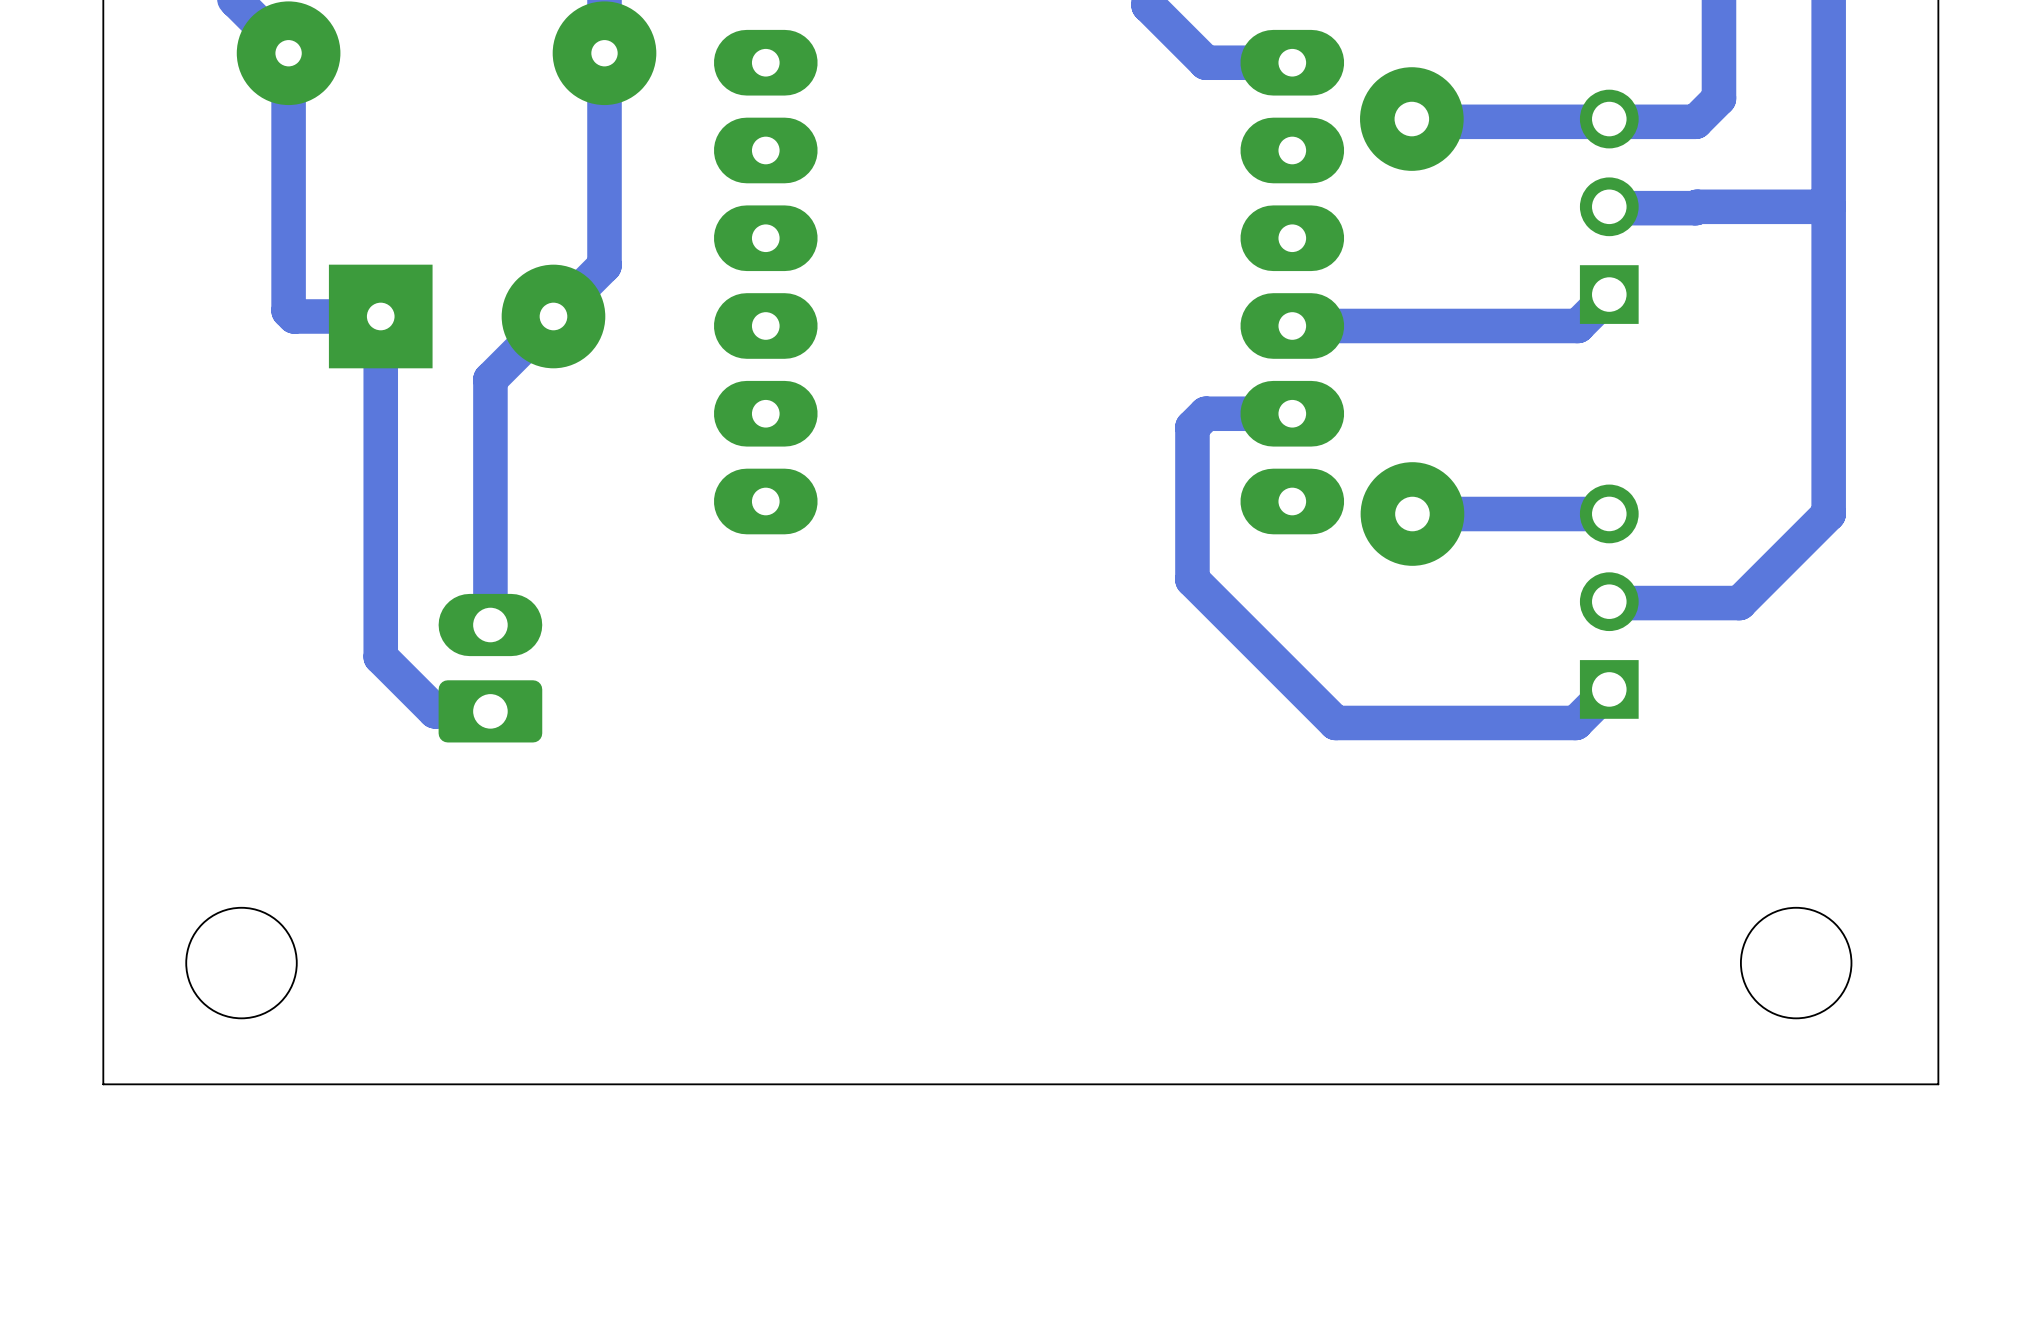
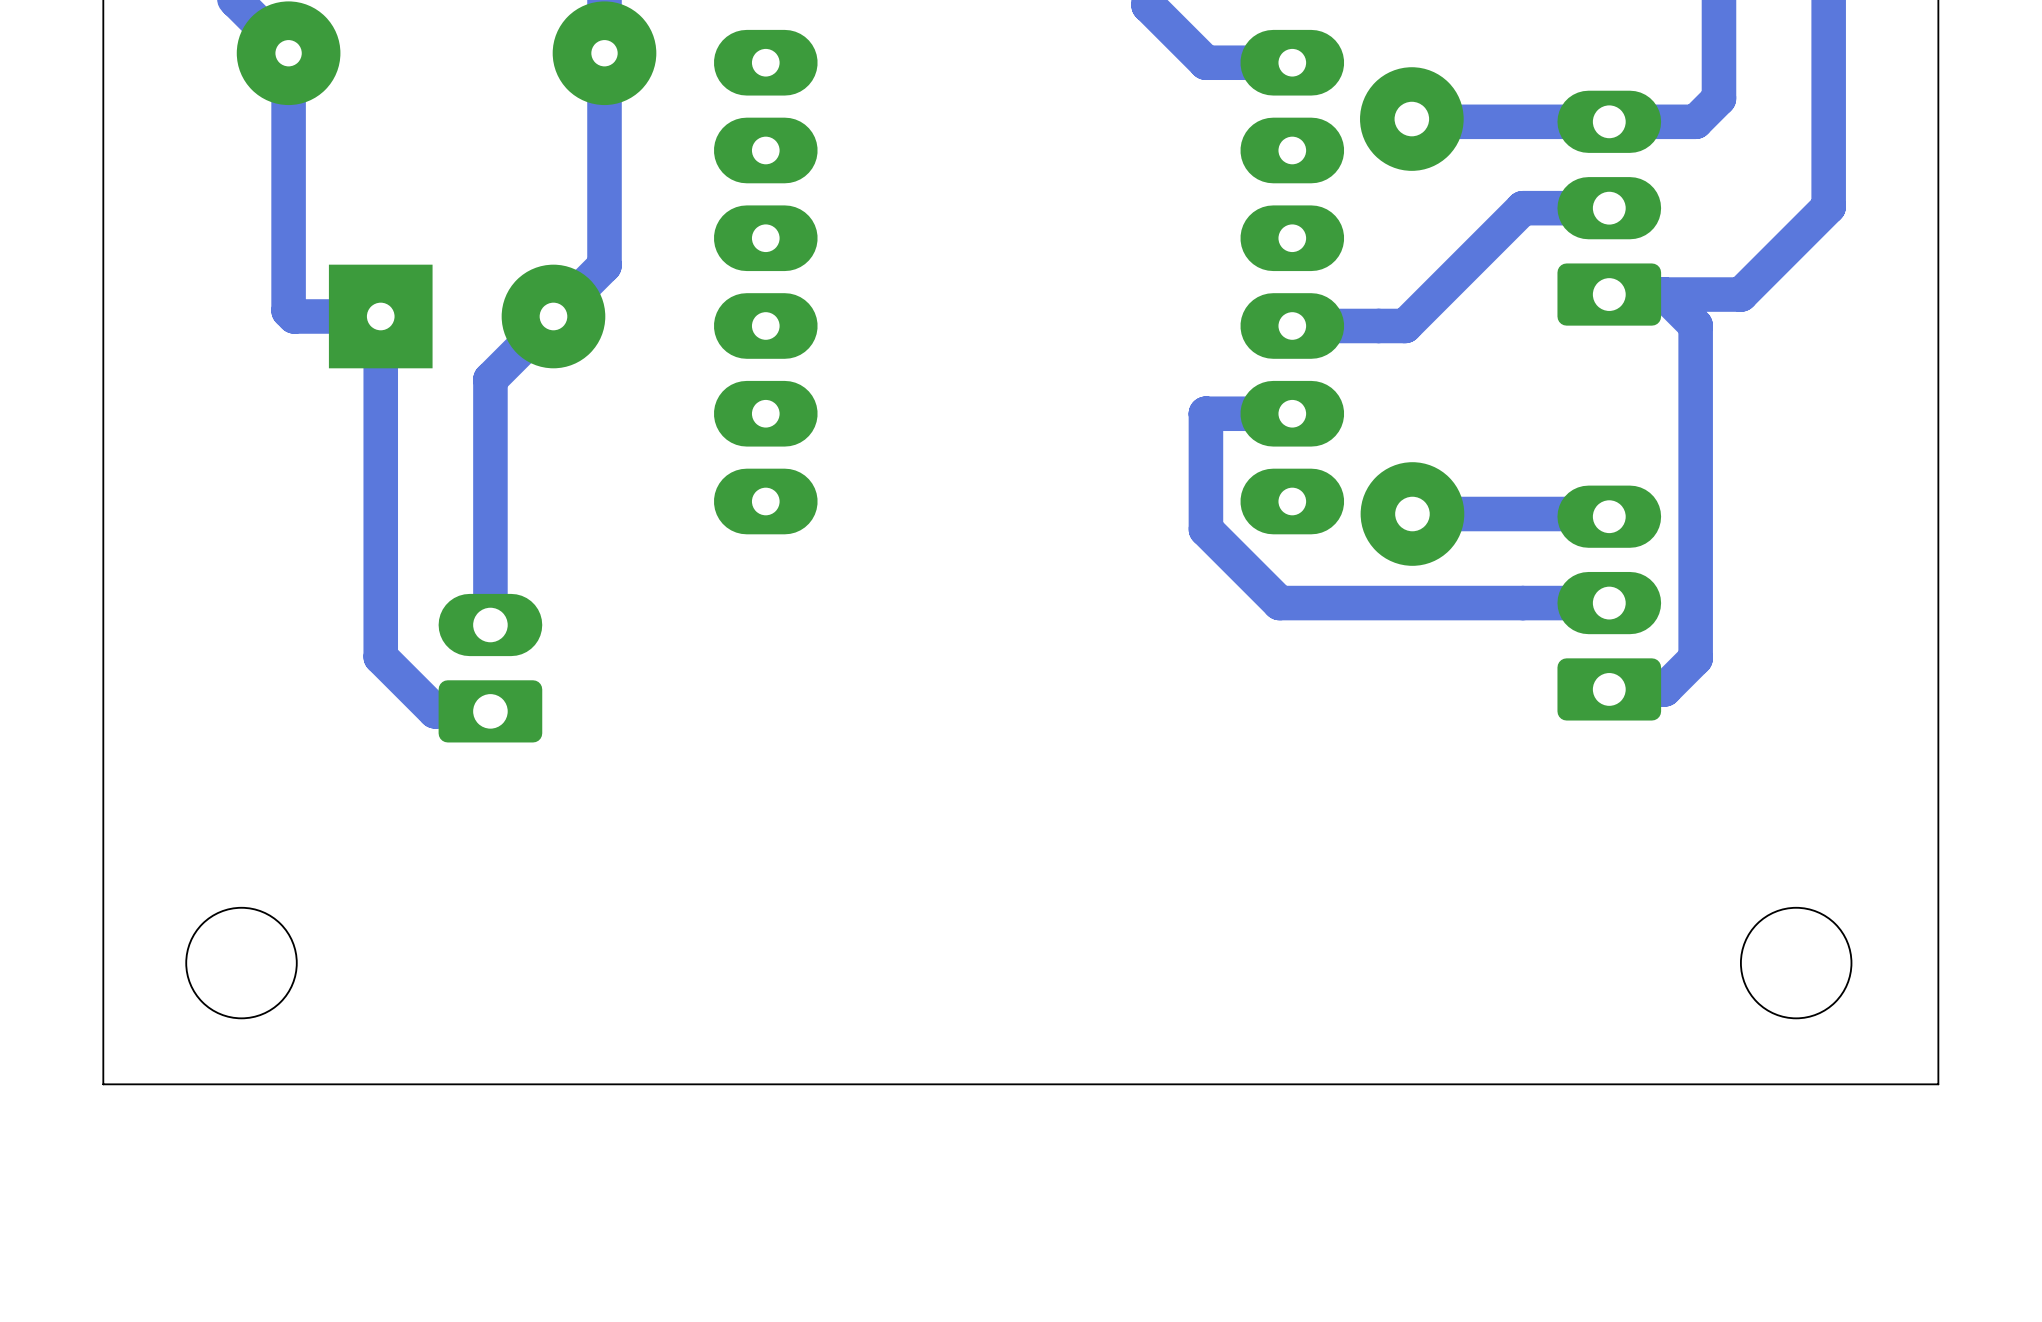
part footprint: [1579, 89, 1639, 324] -> [1557, 90, 1662, 326]
track: none -> (1828, 206) (1740, 294) (1609, 294)
track: (1609, 208) (1828, 206) (1828, 513) (1739, 603) (1609, 603) -> none
track: (1609, 294) (1577, 325) (1405, 325) -> (1609, 208) (1522, 208) (1405, 325)
track: none -> (1664, 294) (1695, 325) (1695, 658) (1664, 689) (1609, 689)
track: (1205, 413) (1192, 427) (1192, 579) (1335, 722) (1575, 722) (1609, 689) -> (1205, 413) (1205, 529) (1279, 603) (1609, 603)
part footprint: [1579, 484, 1639, 719] -> [1557, 485, 1662, 721]

